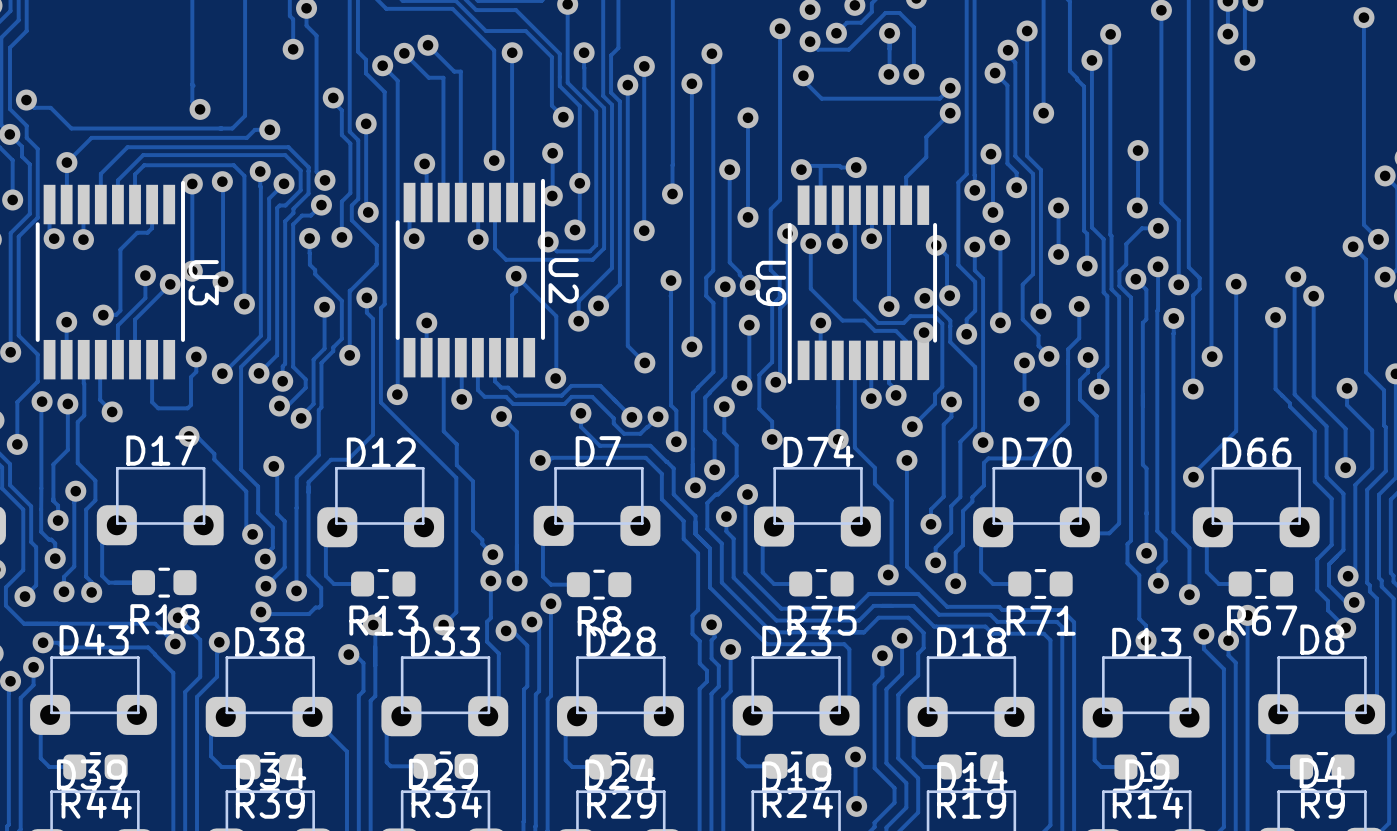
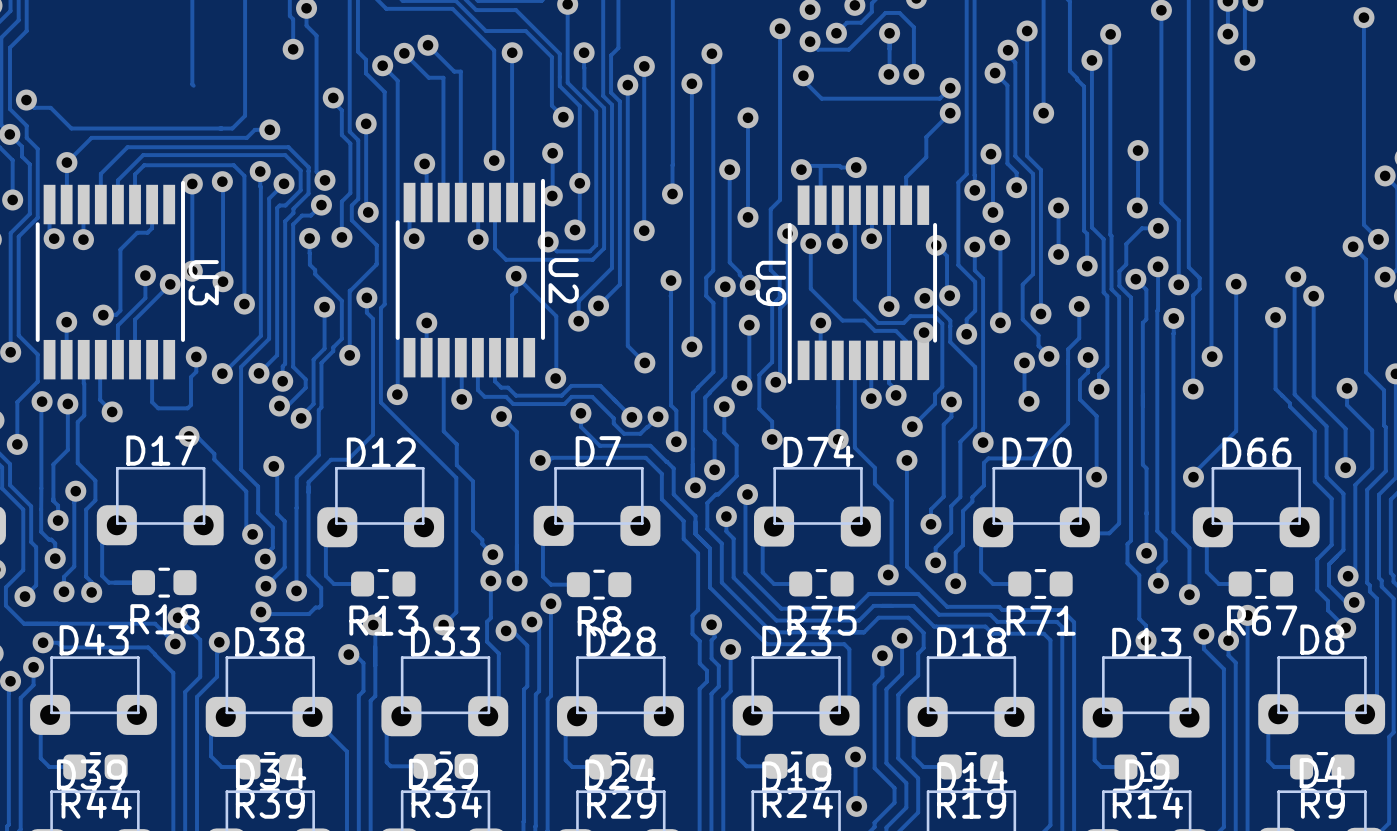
track: (192, 84) (192, 101) (200, 109) -> none
via: (200, 109) -> none

